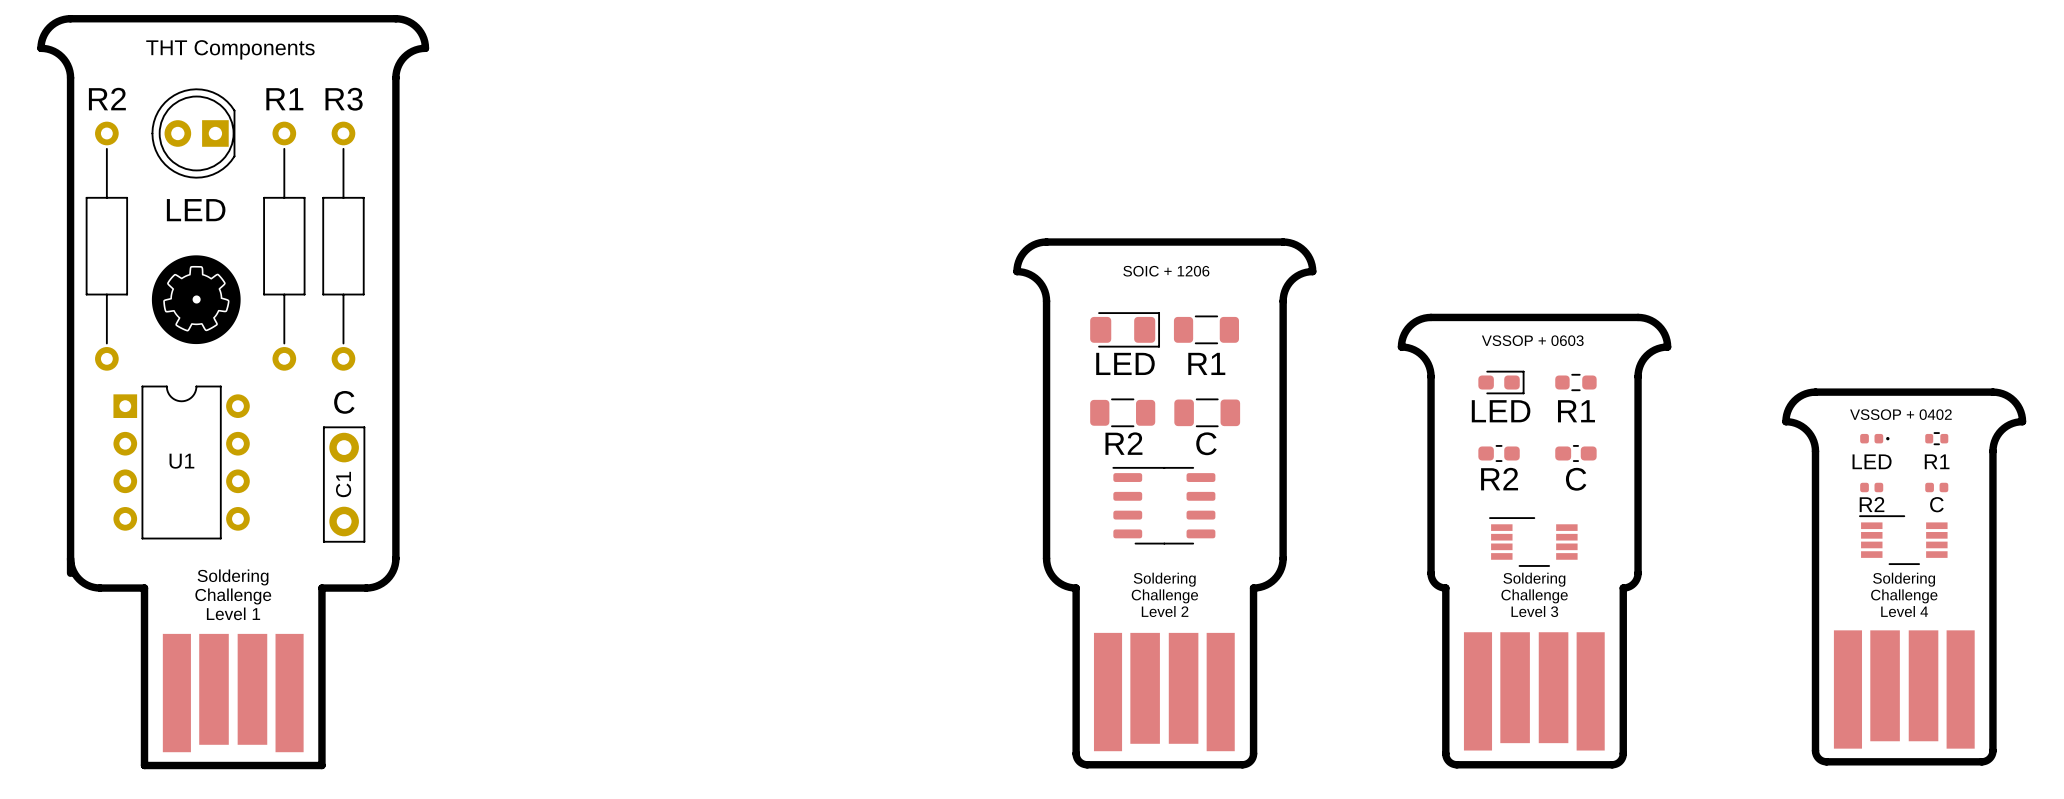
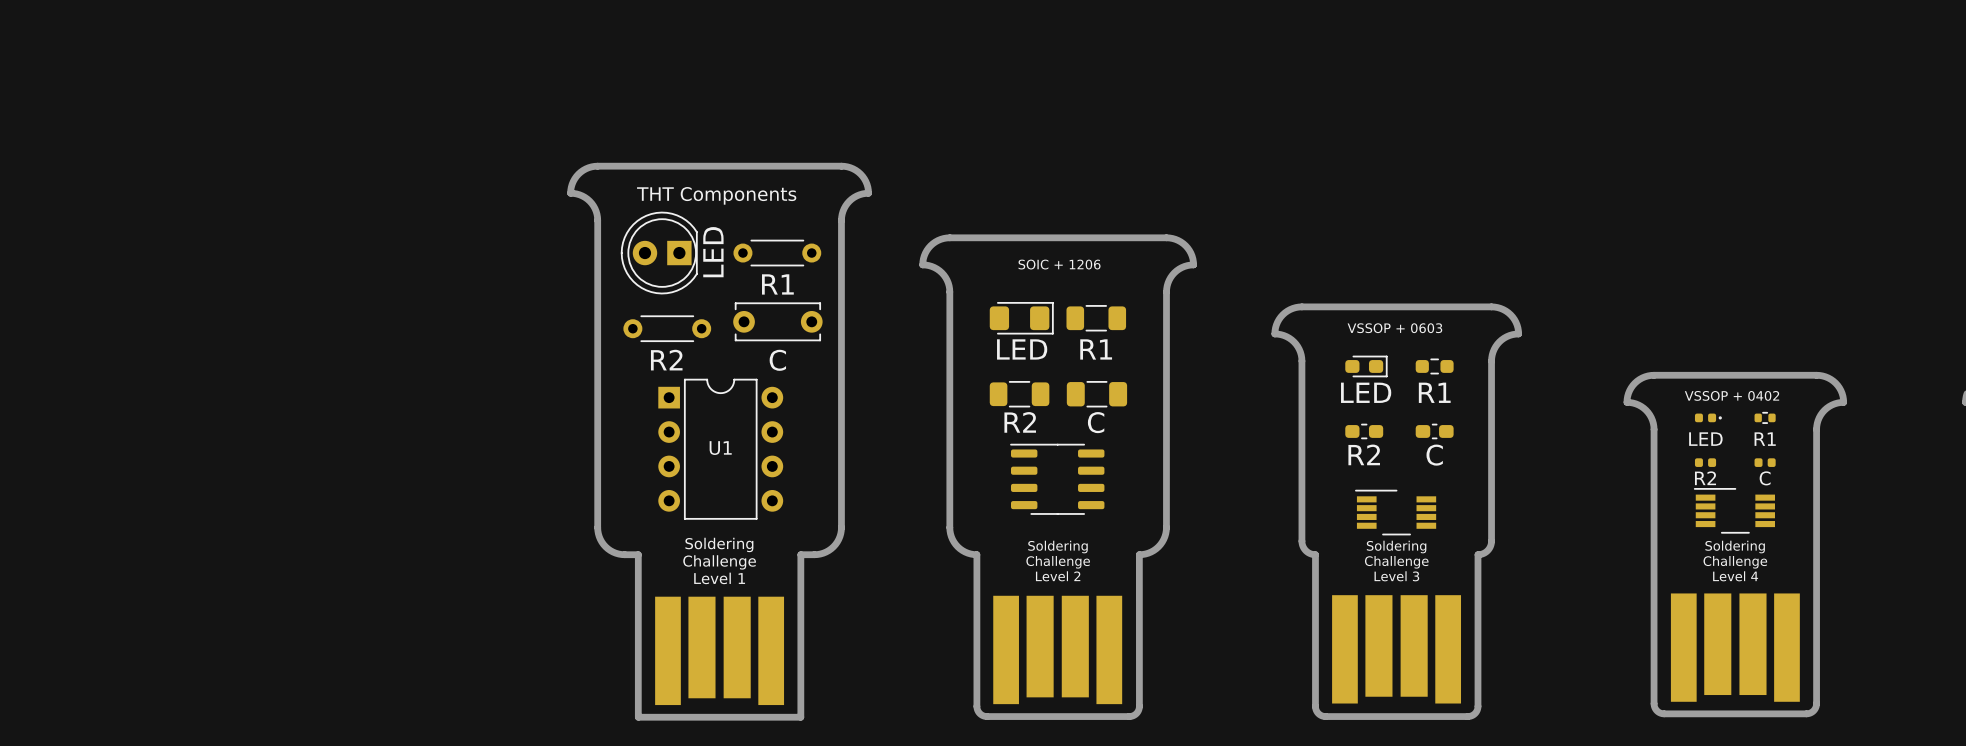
text: THT Components (230, 49) -> none
text: R2 (107, 99) -> none
text: R1 (284, 99) -> none
text: R3 (344, 99) -> none
part: (193, 133) -> none
board edge: none -> (597, 166) (844, 166) (858, 172) (867, 184) (868, 193) (856, 195) (849, 201) (844, 208) (841, 217) (841, 530) (837, 542) (828, 550) (817, 554) (800, 554) (800, 717) (638, 717) (638, 554) (621, 554) (610, 550) (601, 542) (597, 530) (597, 217) (593, 205) (587, 199) (579, 194) (570, 193) (573, 181) (578, 174) (585, 168) (597, 166)
text: none -> THT Components (716, 195)
text: LED (196, 210) -> none
part: (106, 246) -> none
part: (284, 246) -> none
part: (343, 246) -> none
drawing: [151, 255, 241, 345] -> none
text: none -> LED (713, 252)
part: none -> (659, 253)
part: none -> (777, 253)
text: none -> R1 (777, 284)
part: none -> (777, 321)
part: none -> (667, 328)
text: none -> R2 (666, 360)
text: none -> C (777, 360)
text: C (344, 402) -> none
U1 position: (181, 462) -> (720, 449)
C1: (344, 484) -> none
board edge: (70, 558) (70, 561) (71, 565) (72, 568) (77, 576) (90, 586) (144, 588) (144, 765) (321, 765) (321, 588) (376, 586) (389, 576) (395, 561) (396, 74) (398, 65) (407, 54) (415, 49) (425, 48) (422, 35) (411, 23) (395, 18) (70, 18) (57, 21) (45, 32) (40, 48) (50, 49) (61, 56) (68, 68) (70, 77) (70, 573) -> none
text: Soldering (233, 577) -> none
text: none -> Soldering (719, 544)
text: Challenge (233, 596) -> none
text: none -> Challenge (719, 562)
text: Level 1 (233, 613) -> none
text: none -> Level 1 (719, 578)
part: (233, 693) -> none
part: none -> (719, 650)

